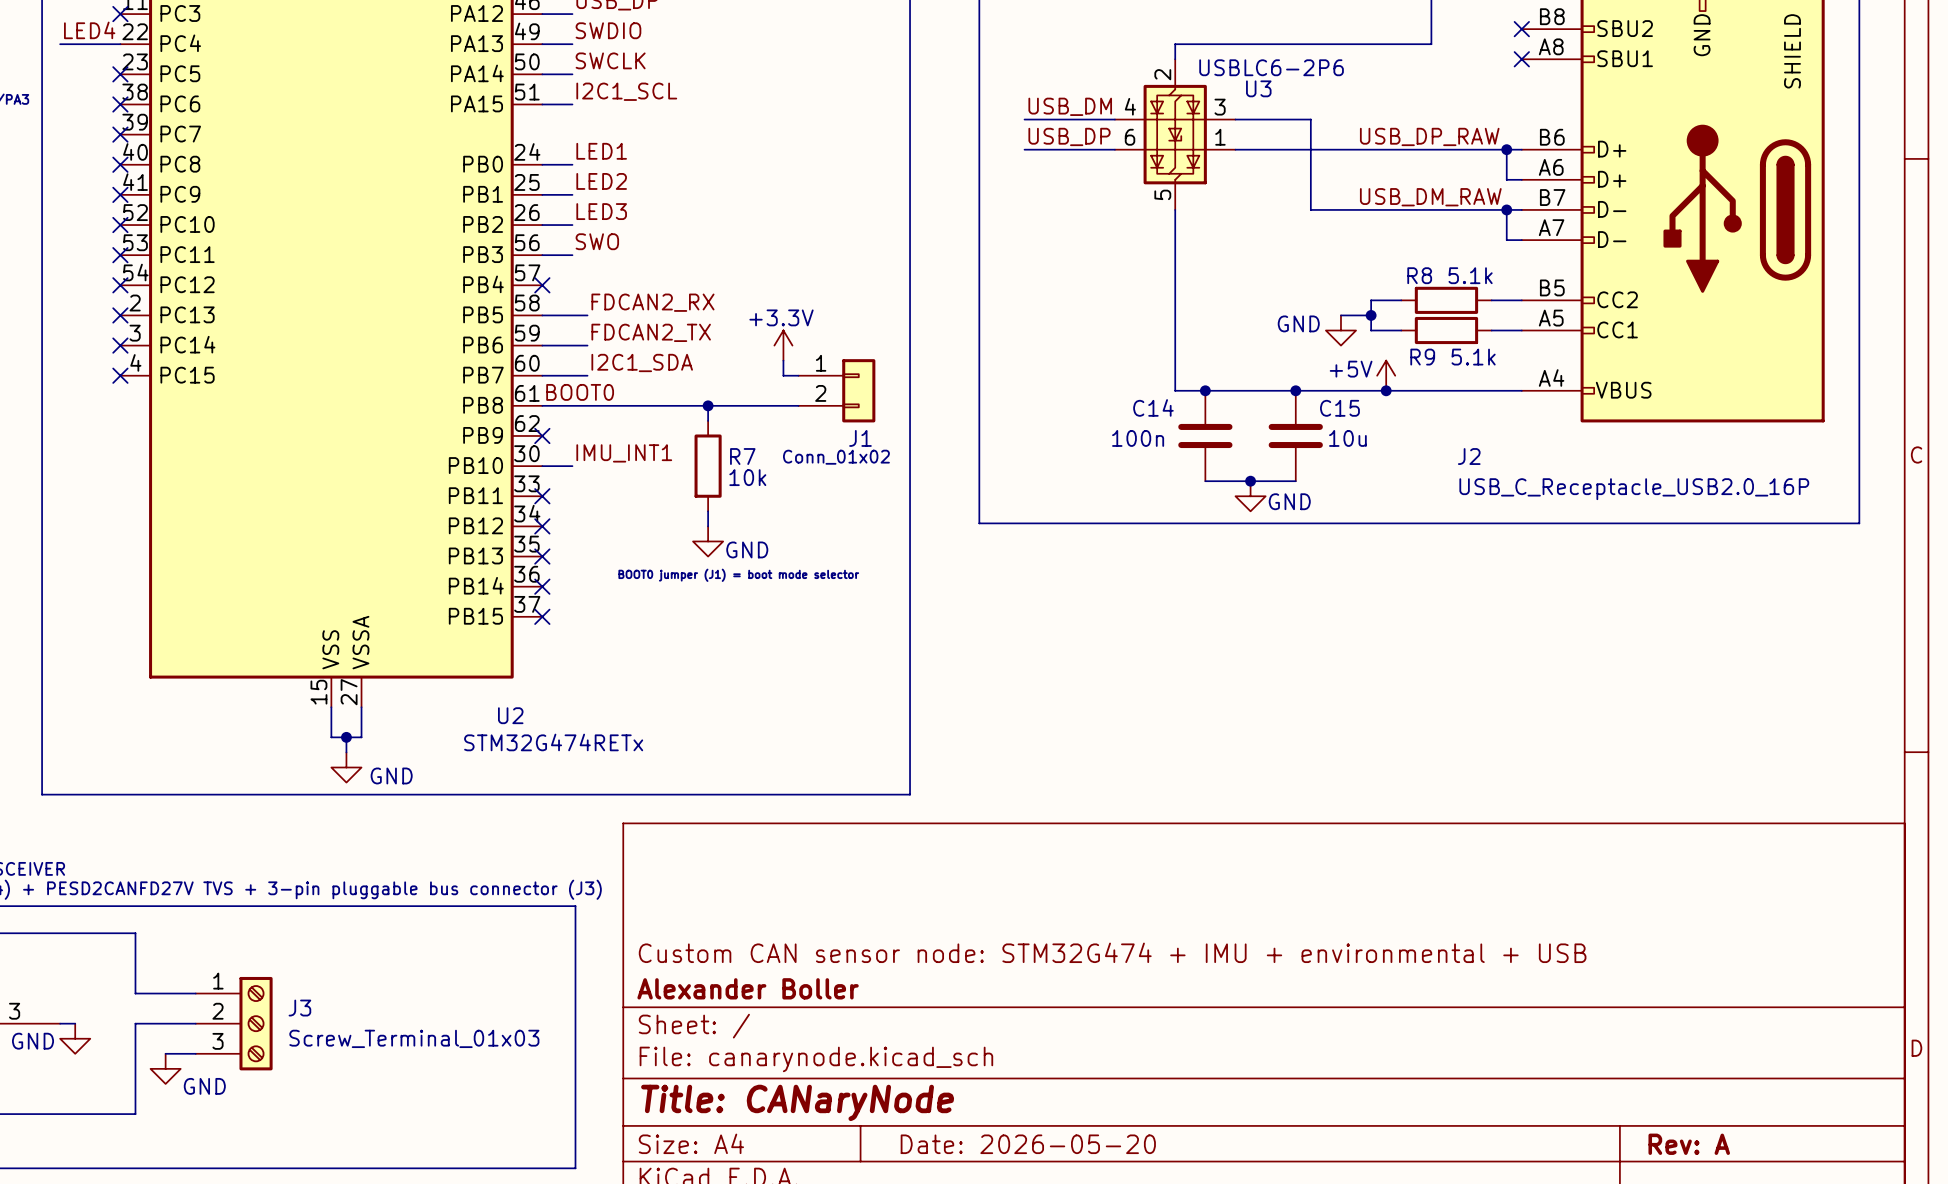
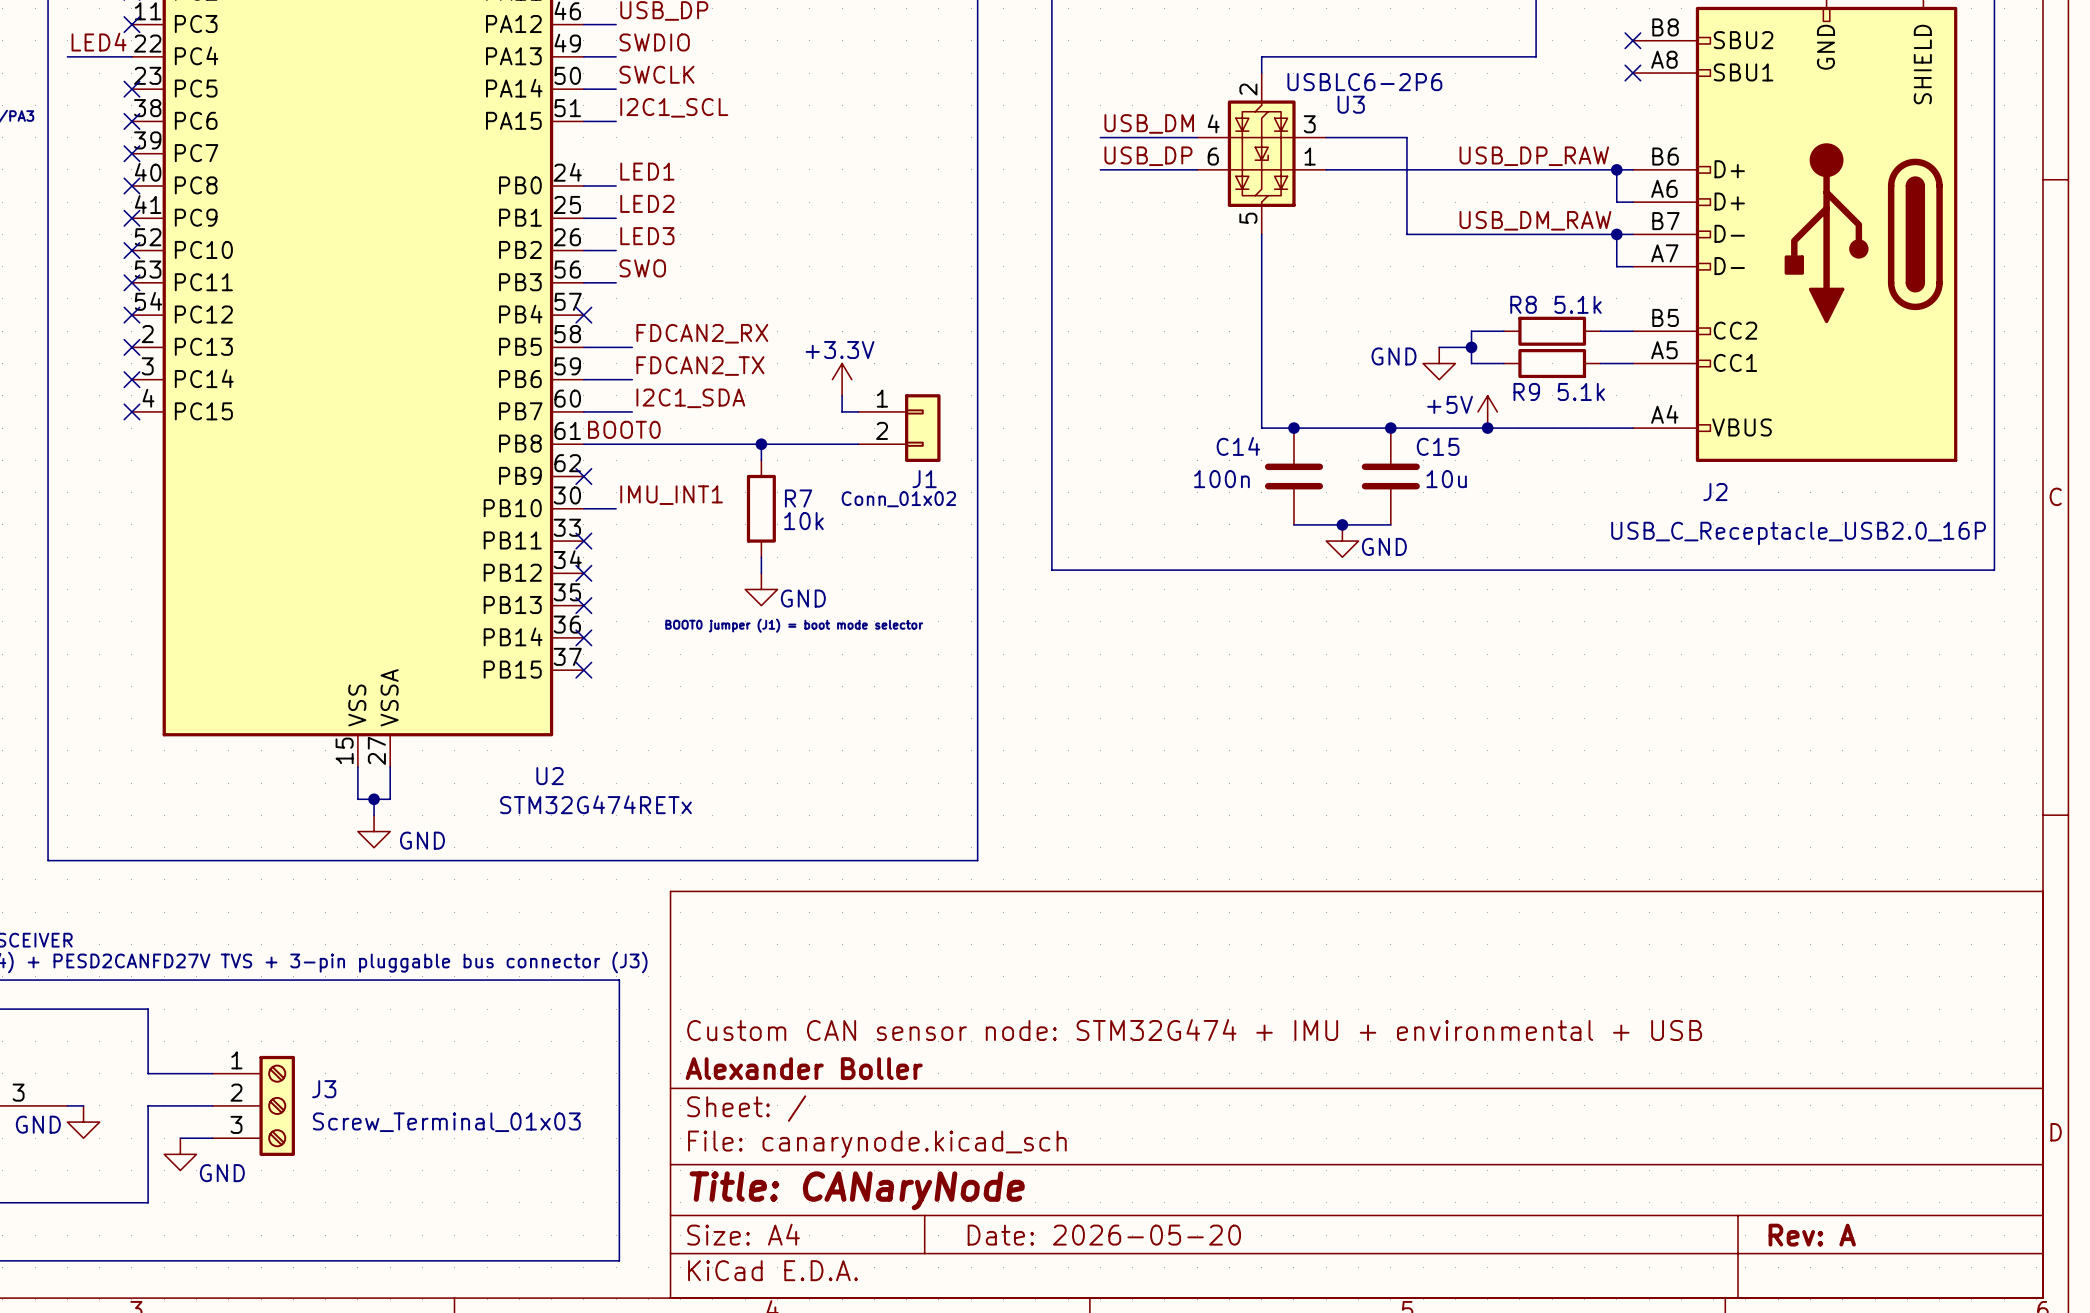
J2 name position: J2 (1469, 456) -> J2 (1715, 492)
J2 value position: USB_C_Receptacle_USB2.0_16P (1634, 489) -> USB_C_Receptacle_USB2.0_16P (1798, 533)

